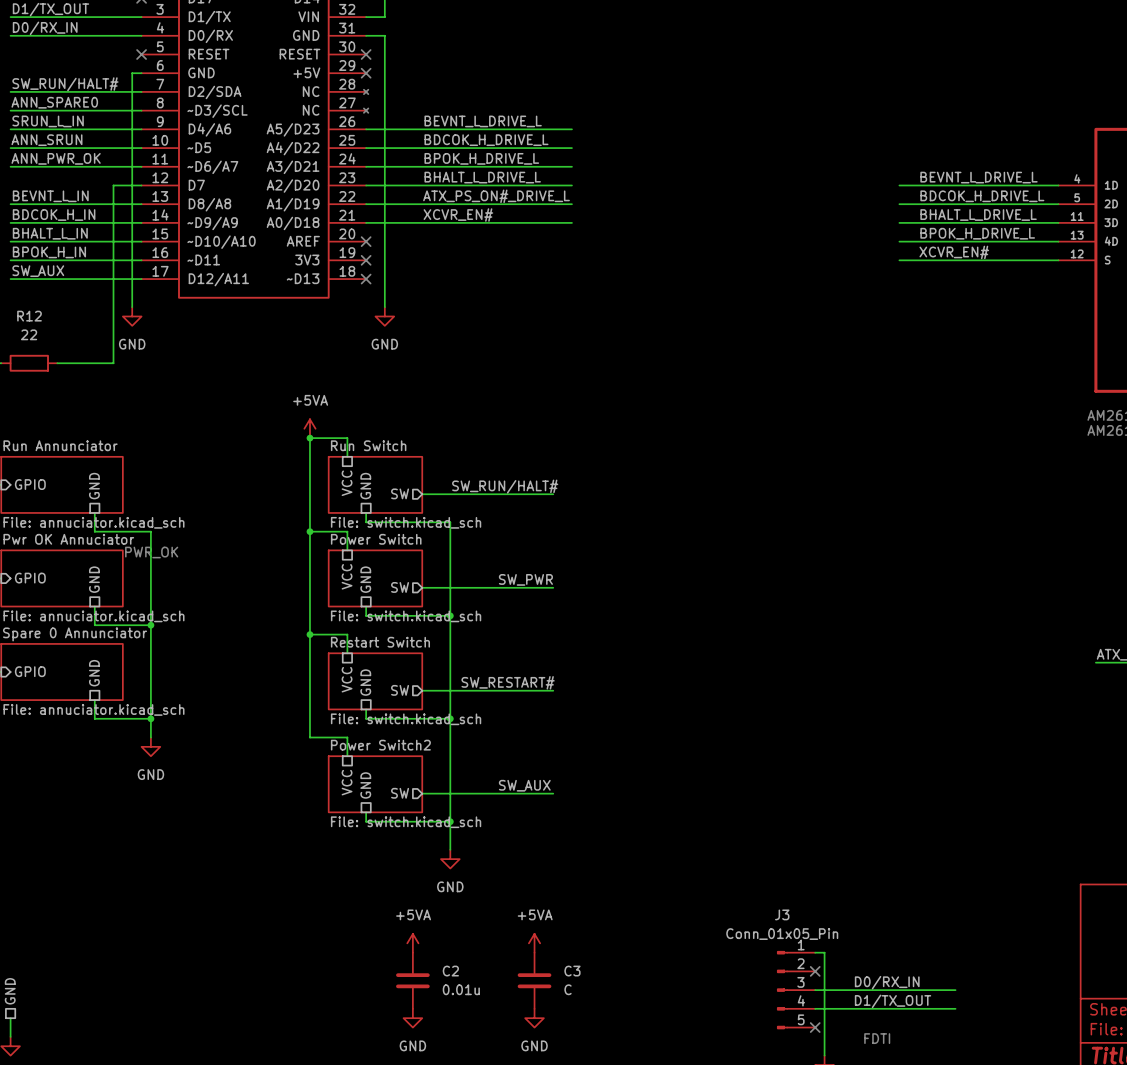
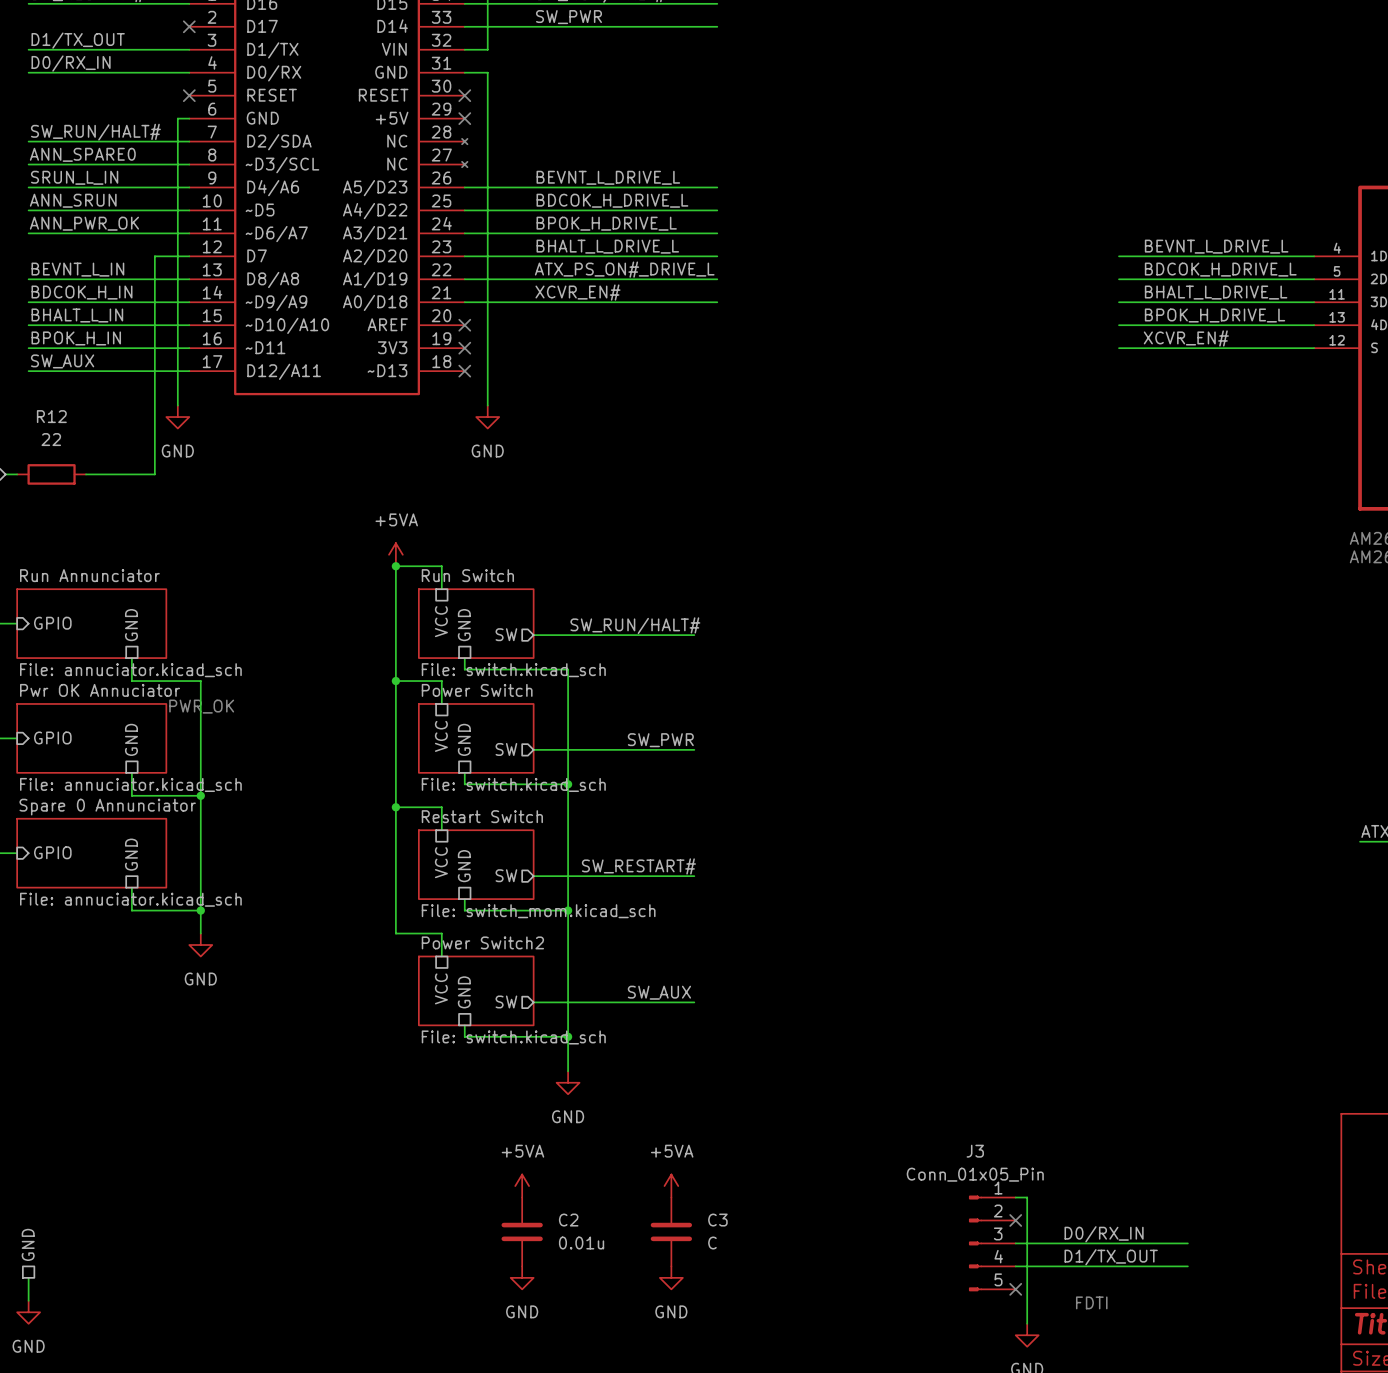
sheet Restart Switch value: File: switch.kicad_sch (406, 719) -> File: switch_mom.kicad_sch (538, 911)

